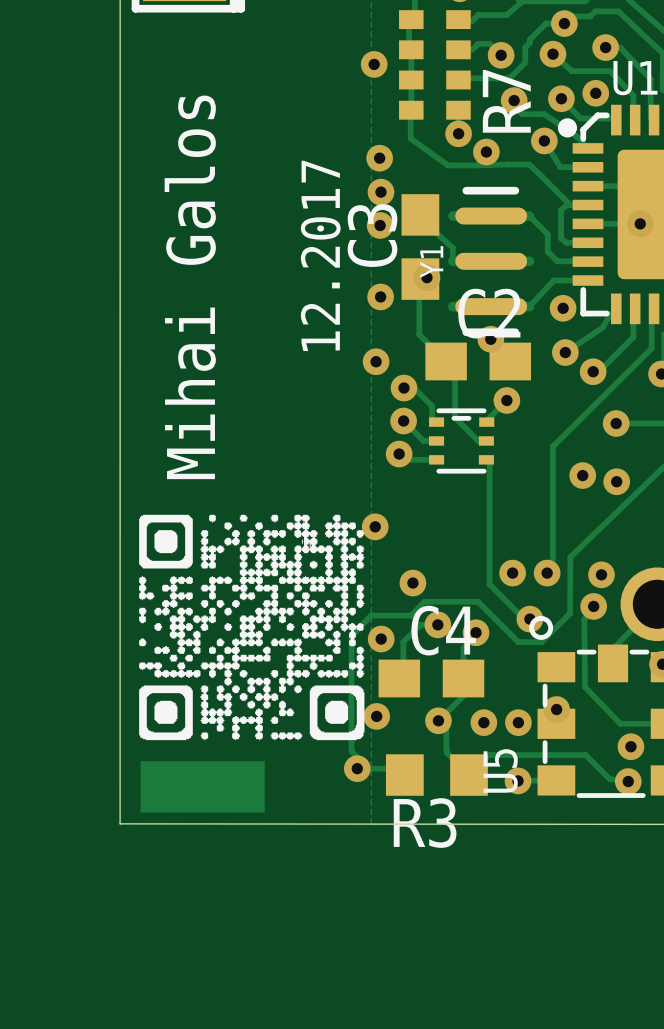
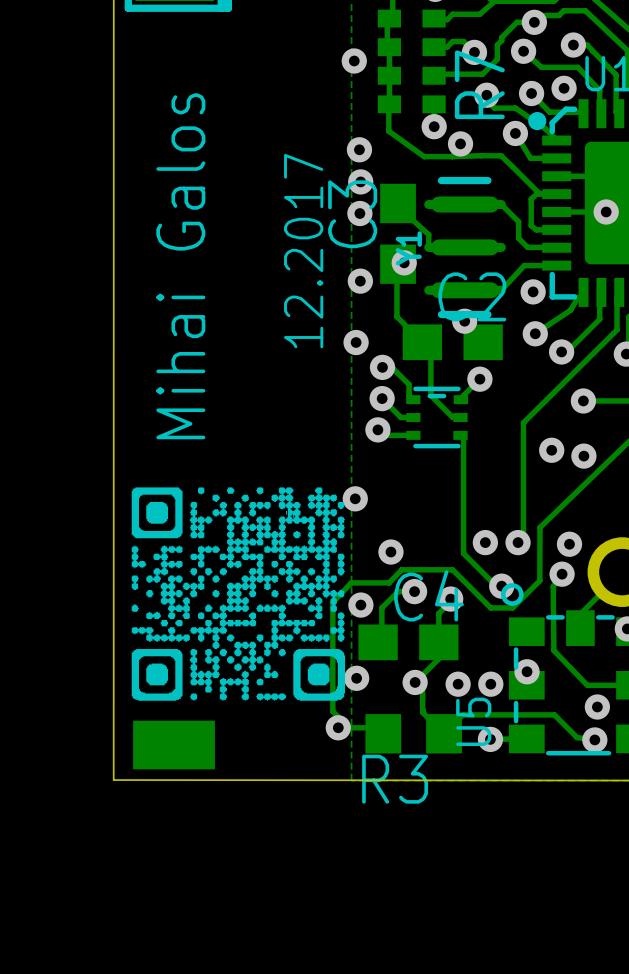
drawing shape: [140, 761, 265, 813] -> [133, 720, 215, 770]

